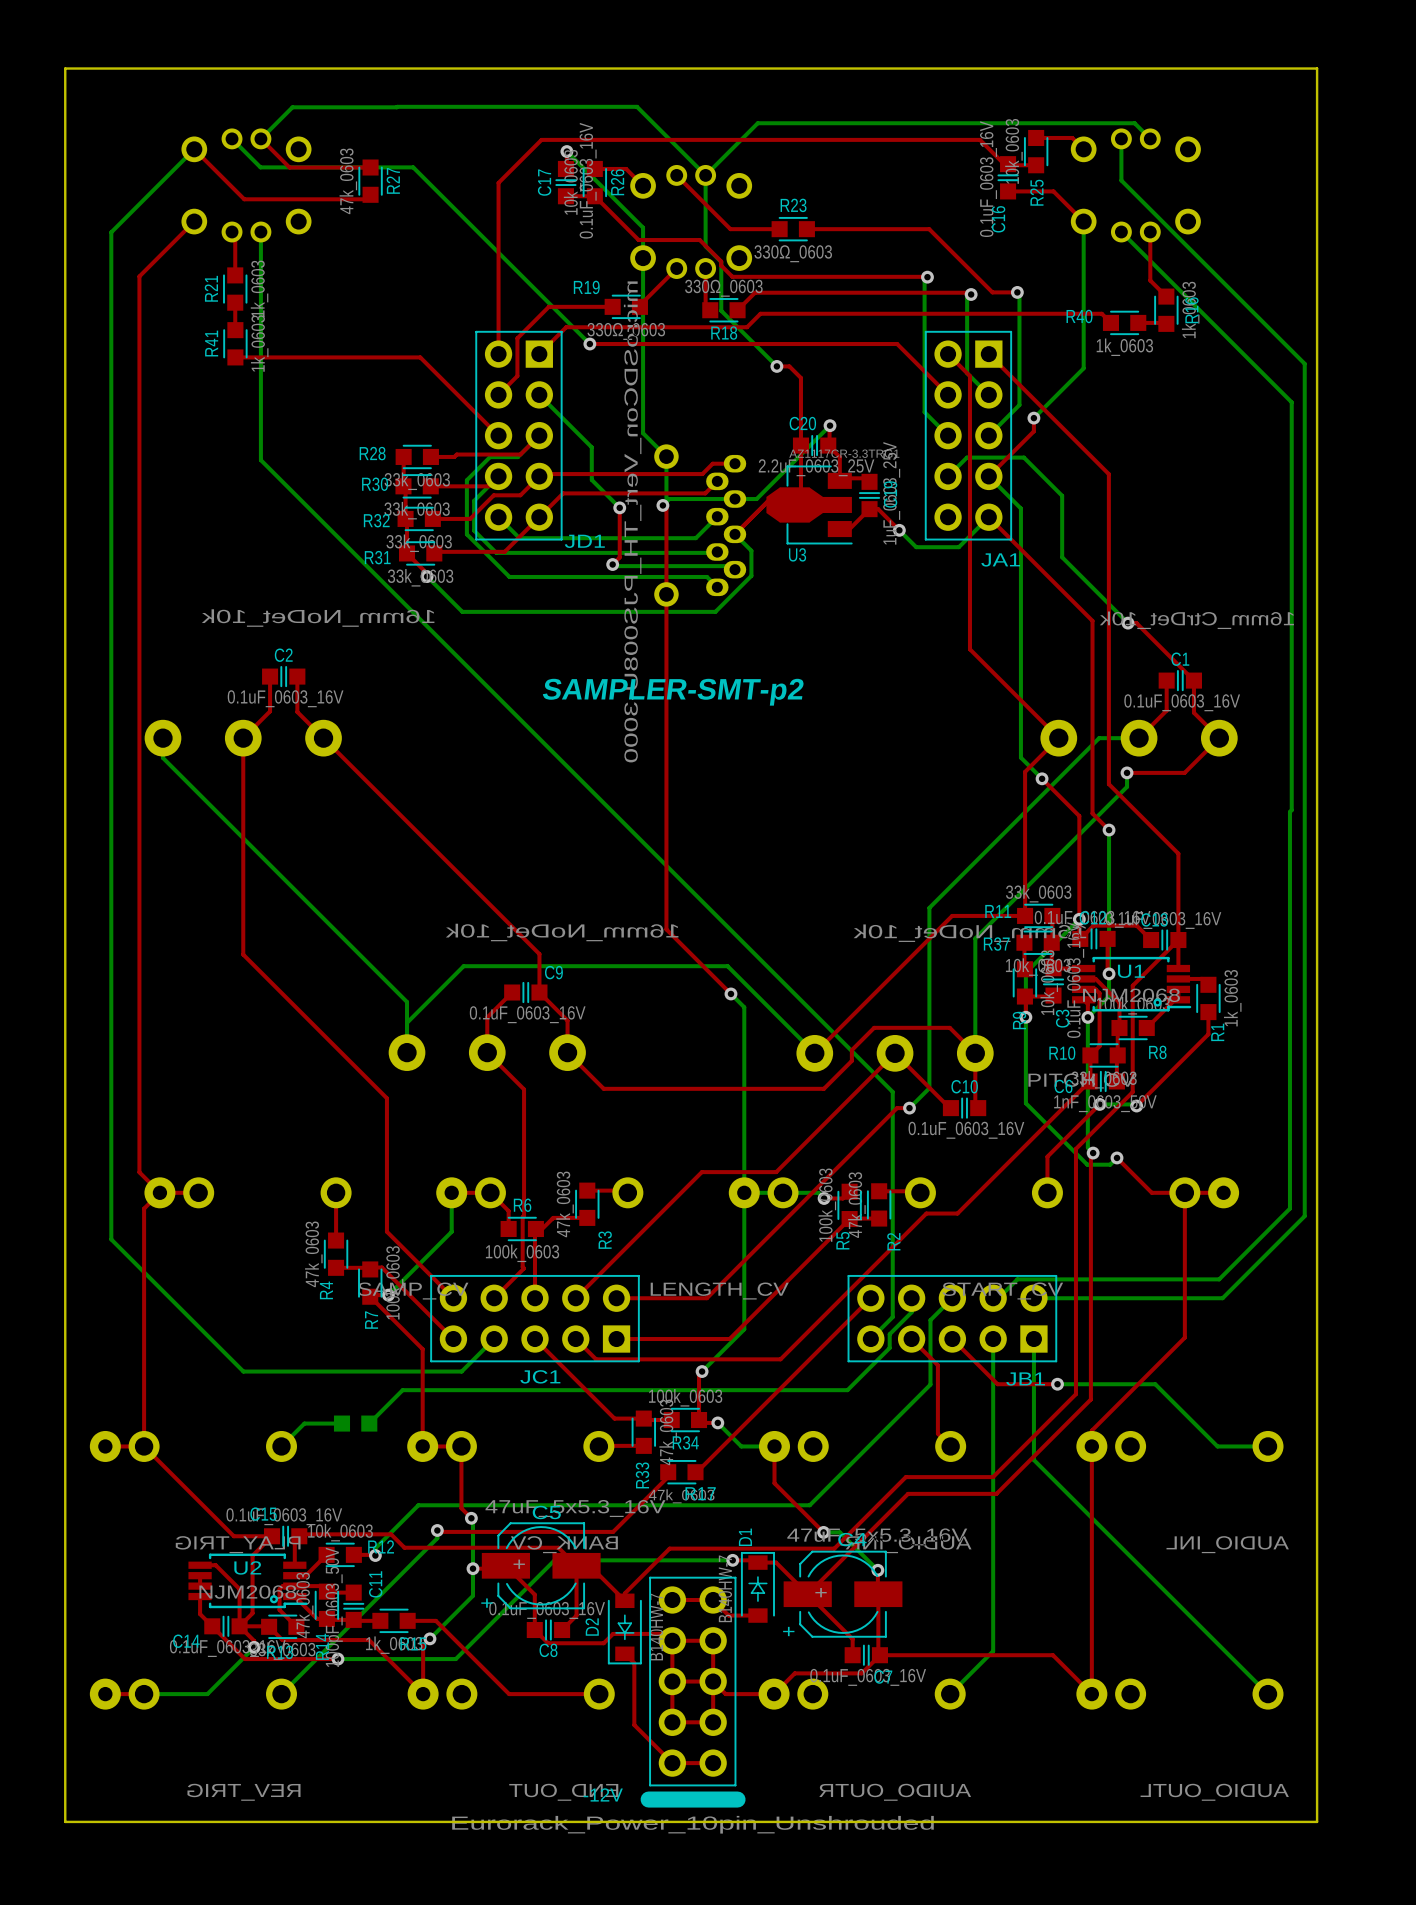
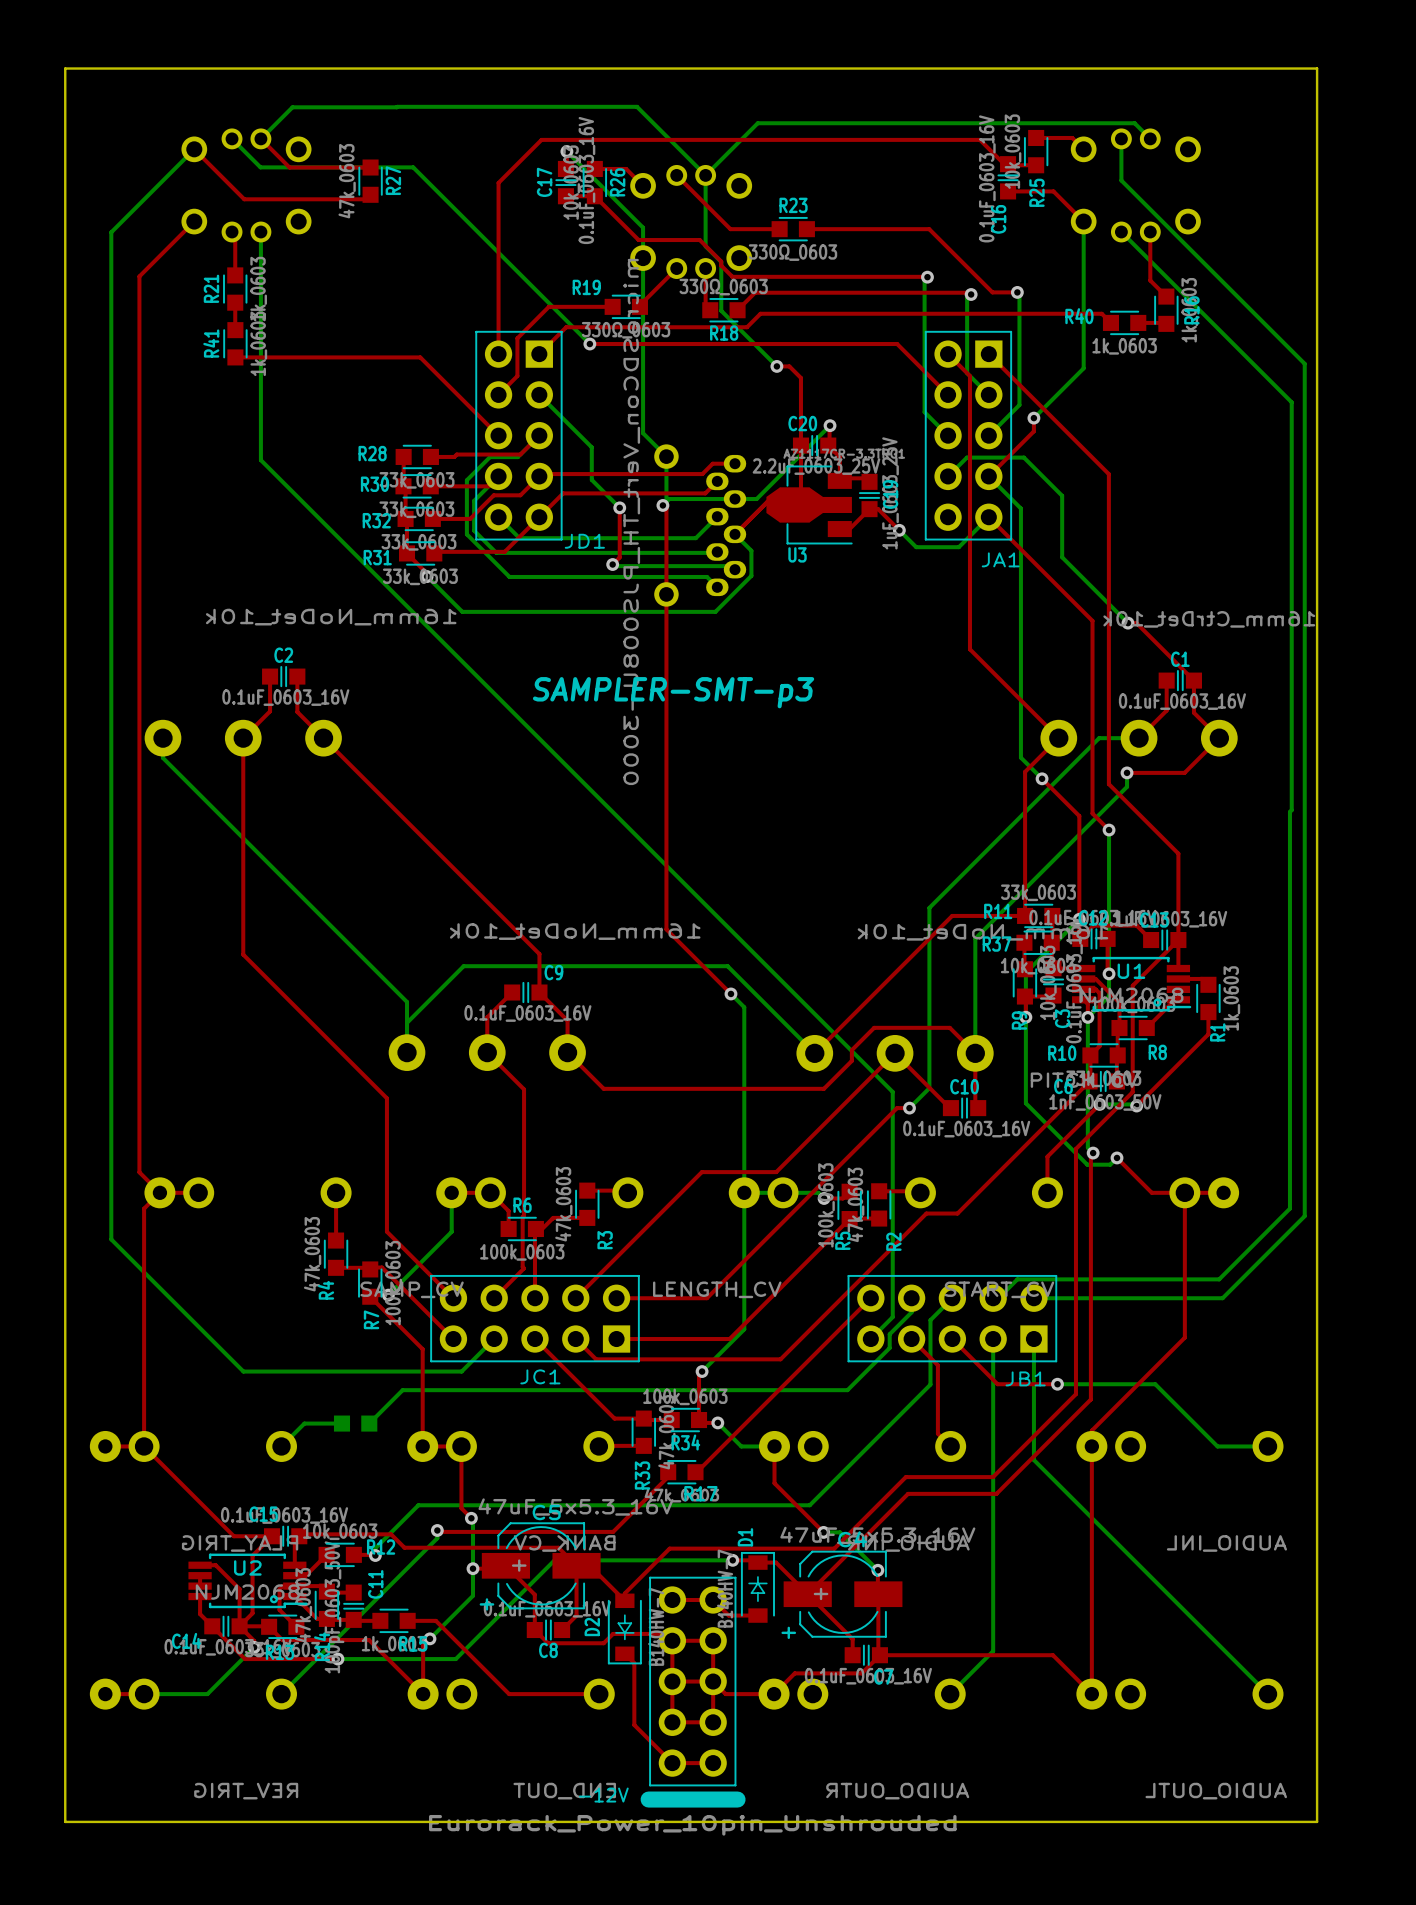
text: SAMPLER-SMT-p2 (673, 692) -> SAMPLER-SMT-p3 (673, 692)

